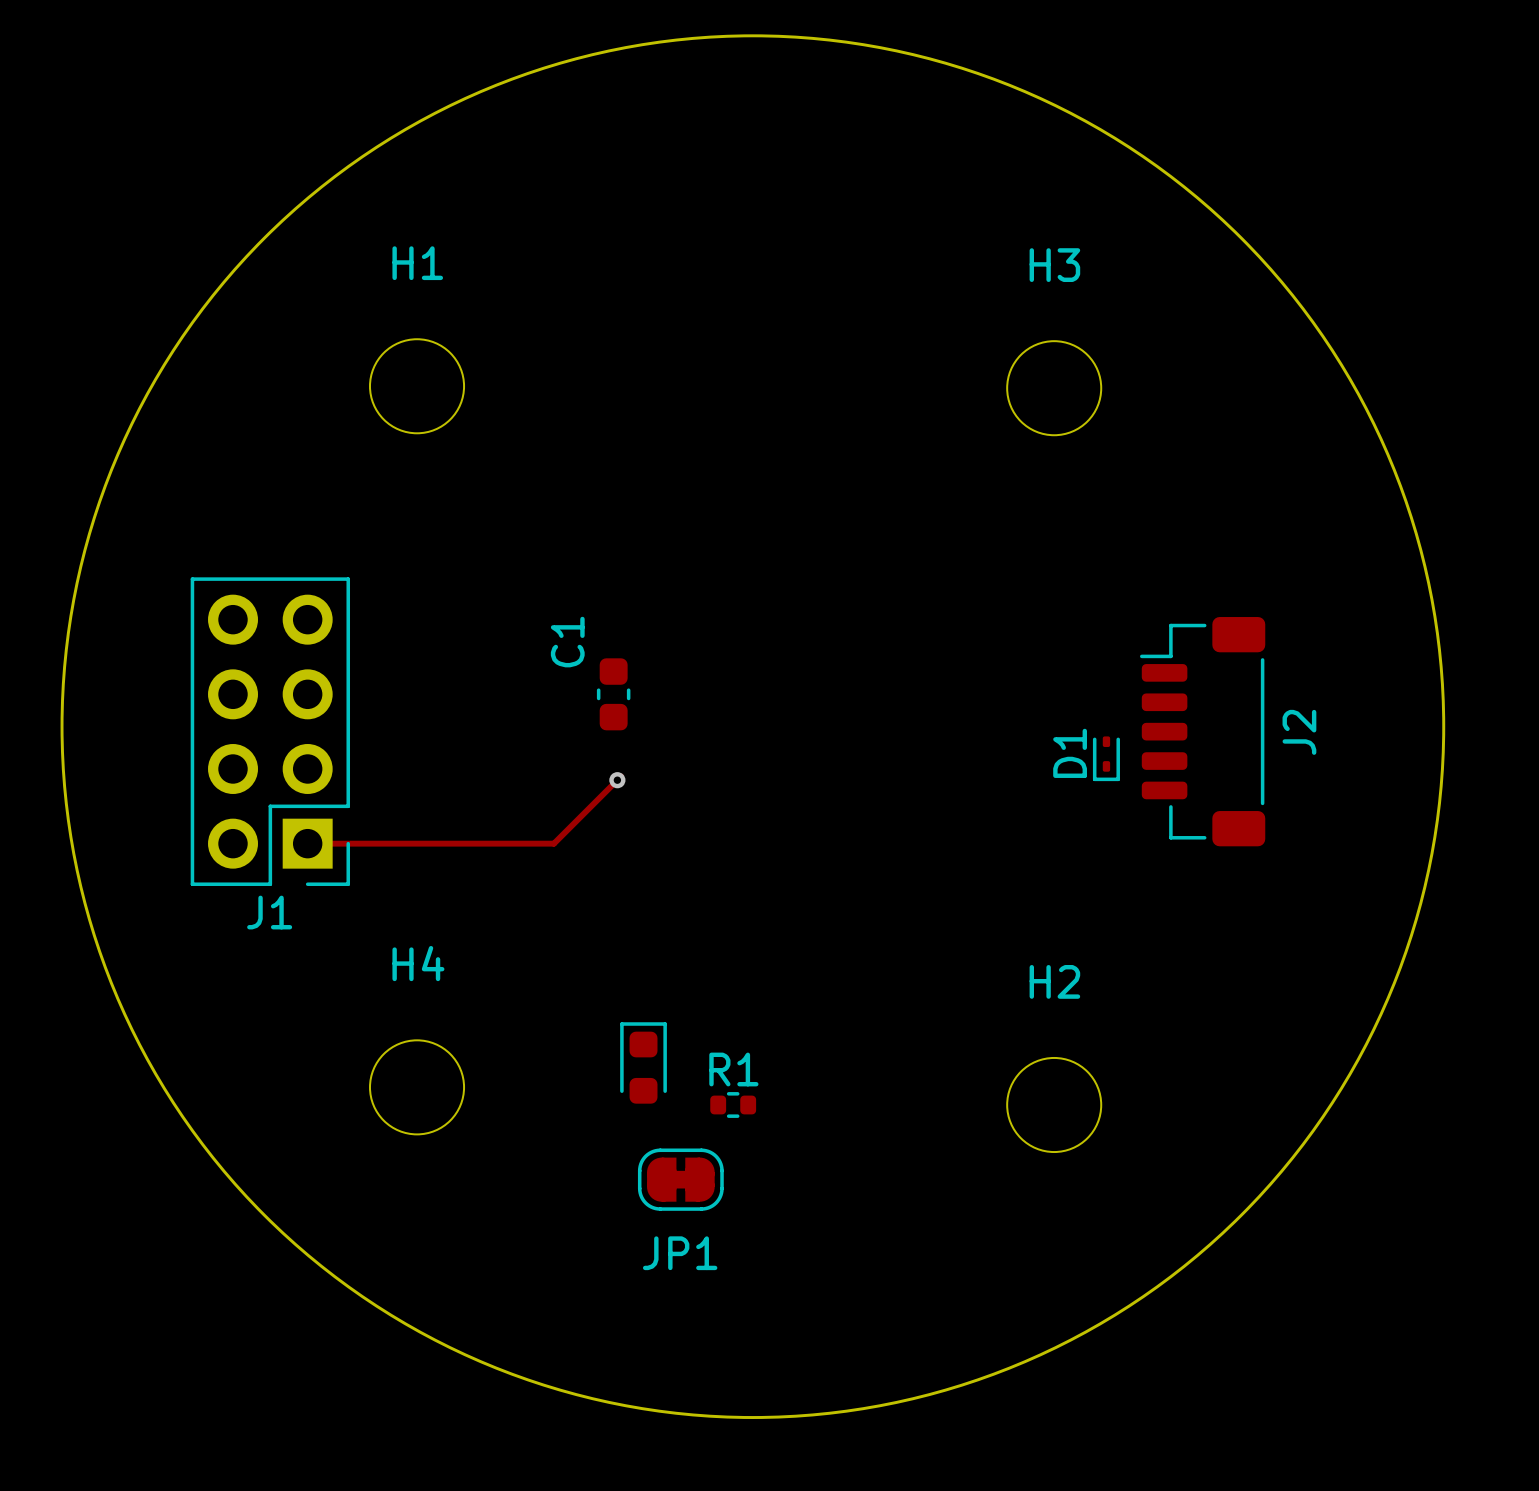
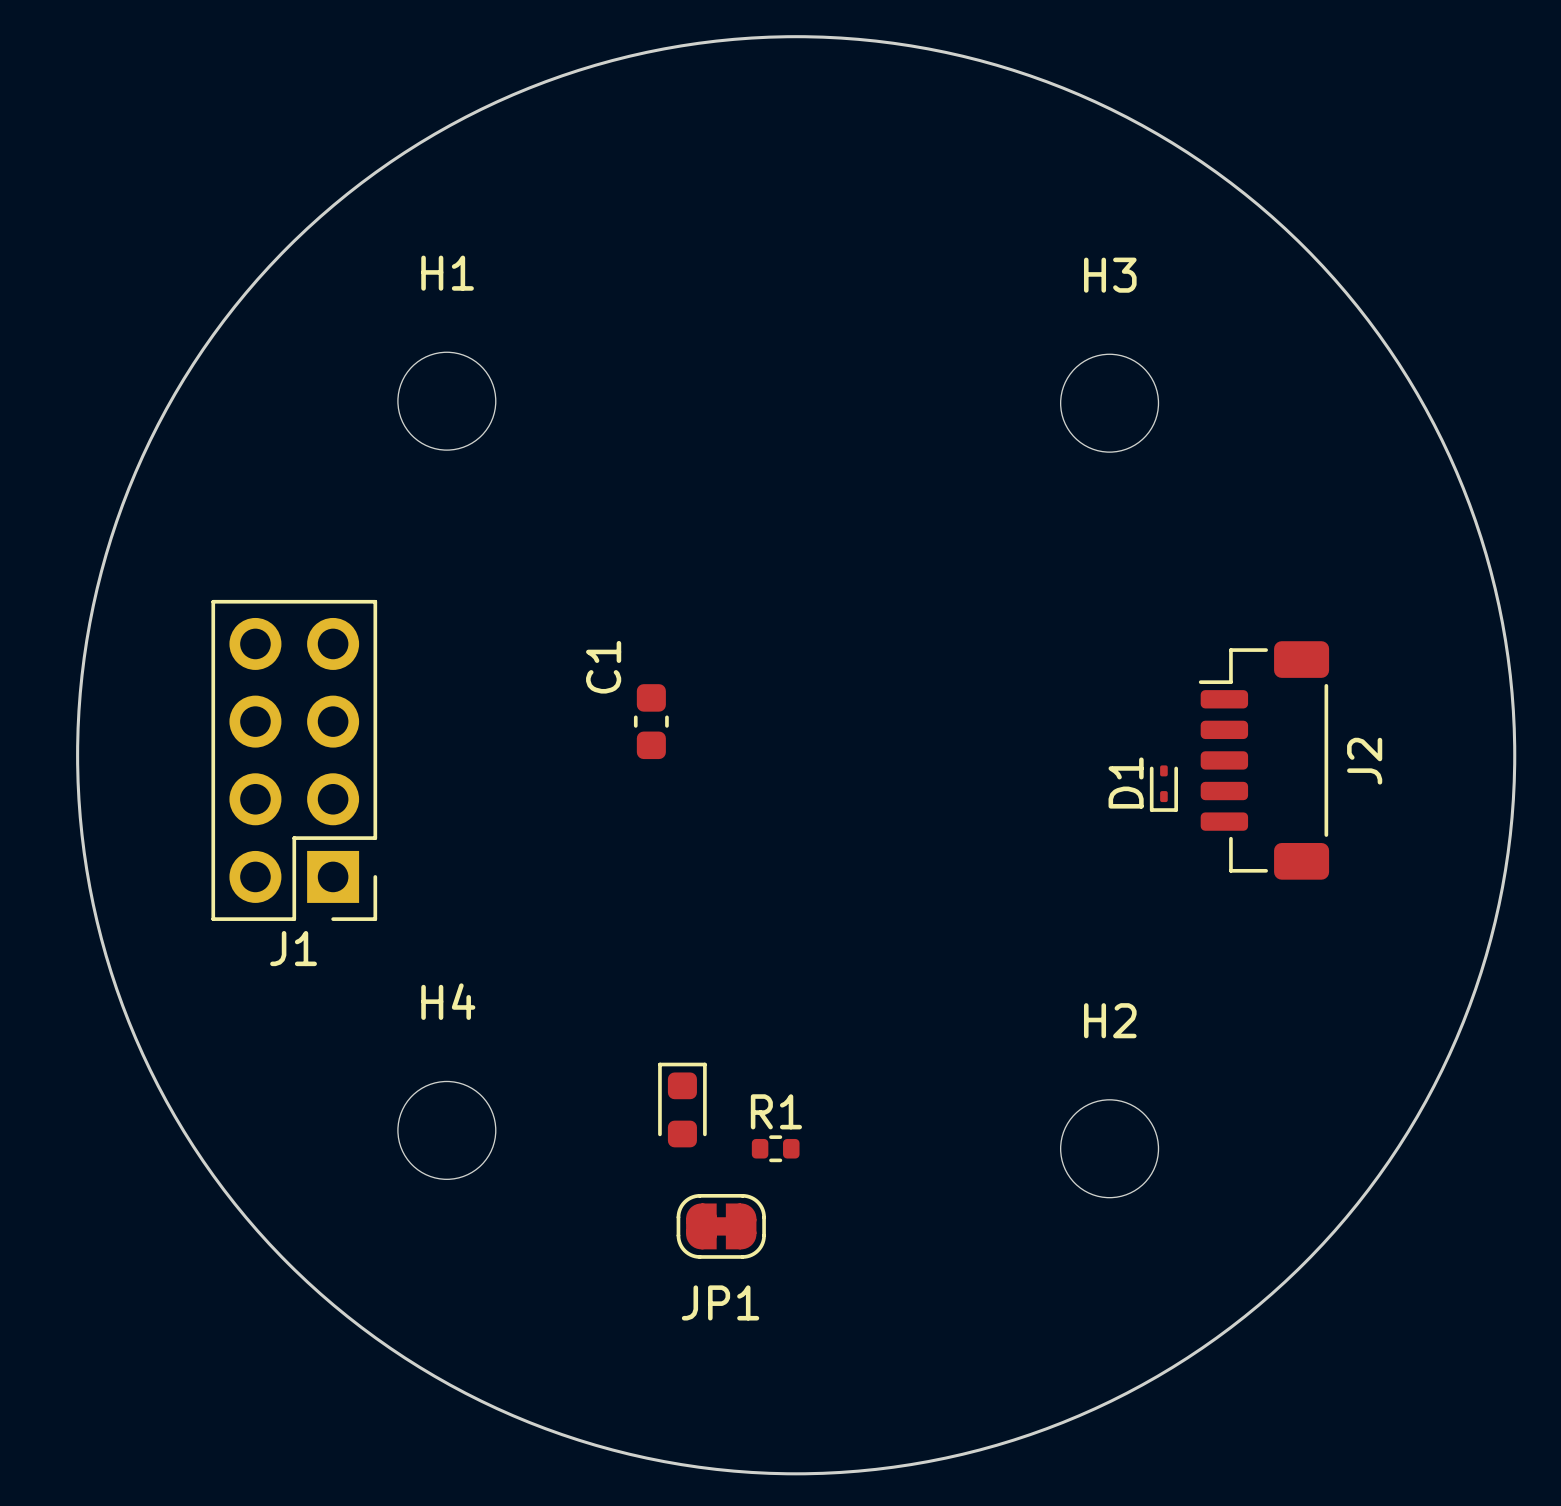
track: (621, 776) (553, 843) (307, 843) -> none
via: (617, 780) -> none

